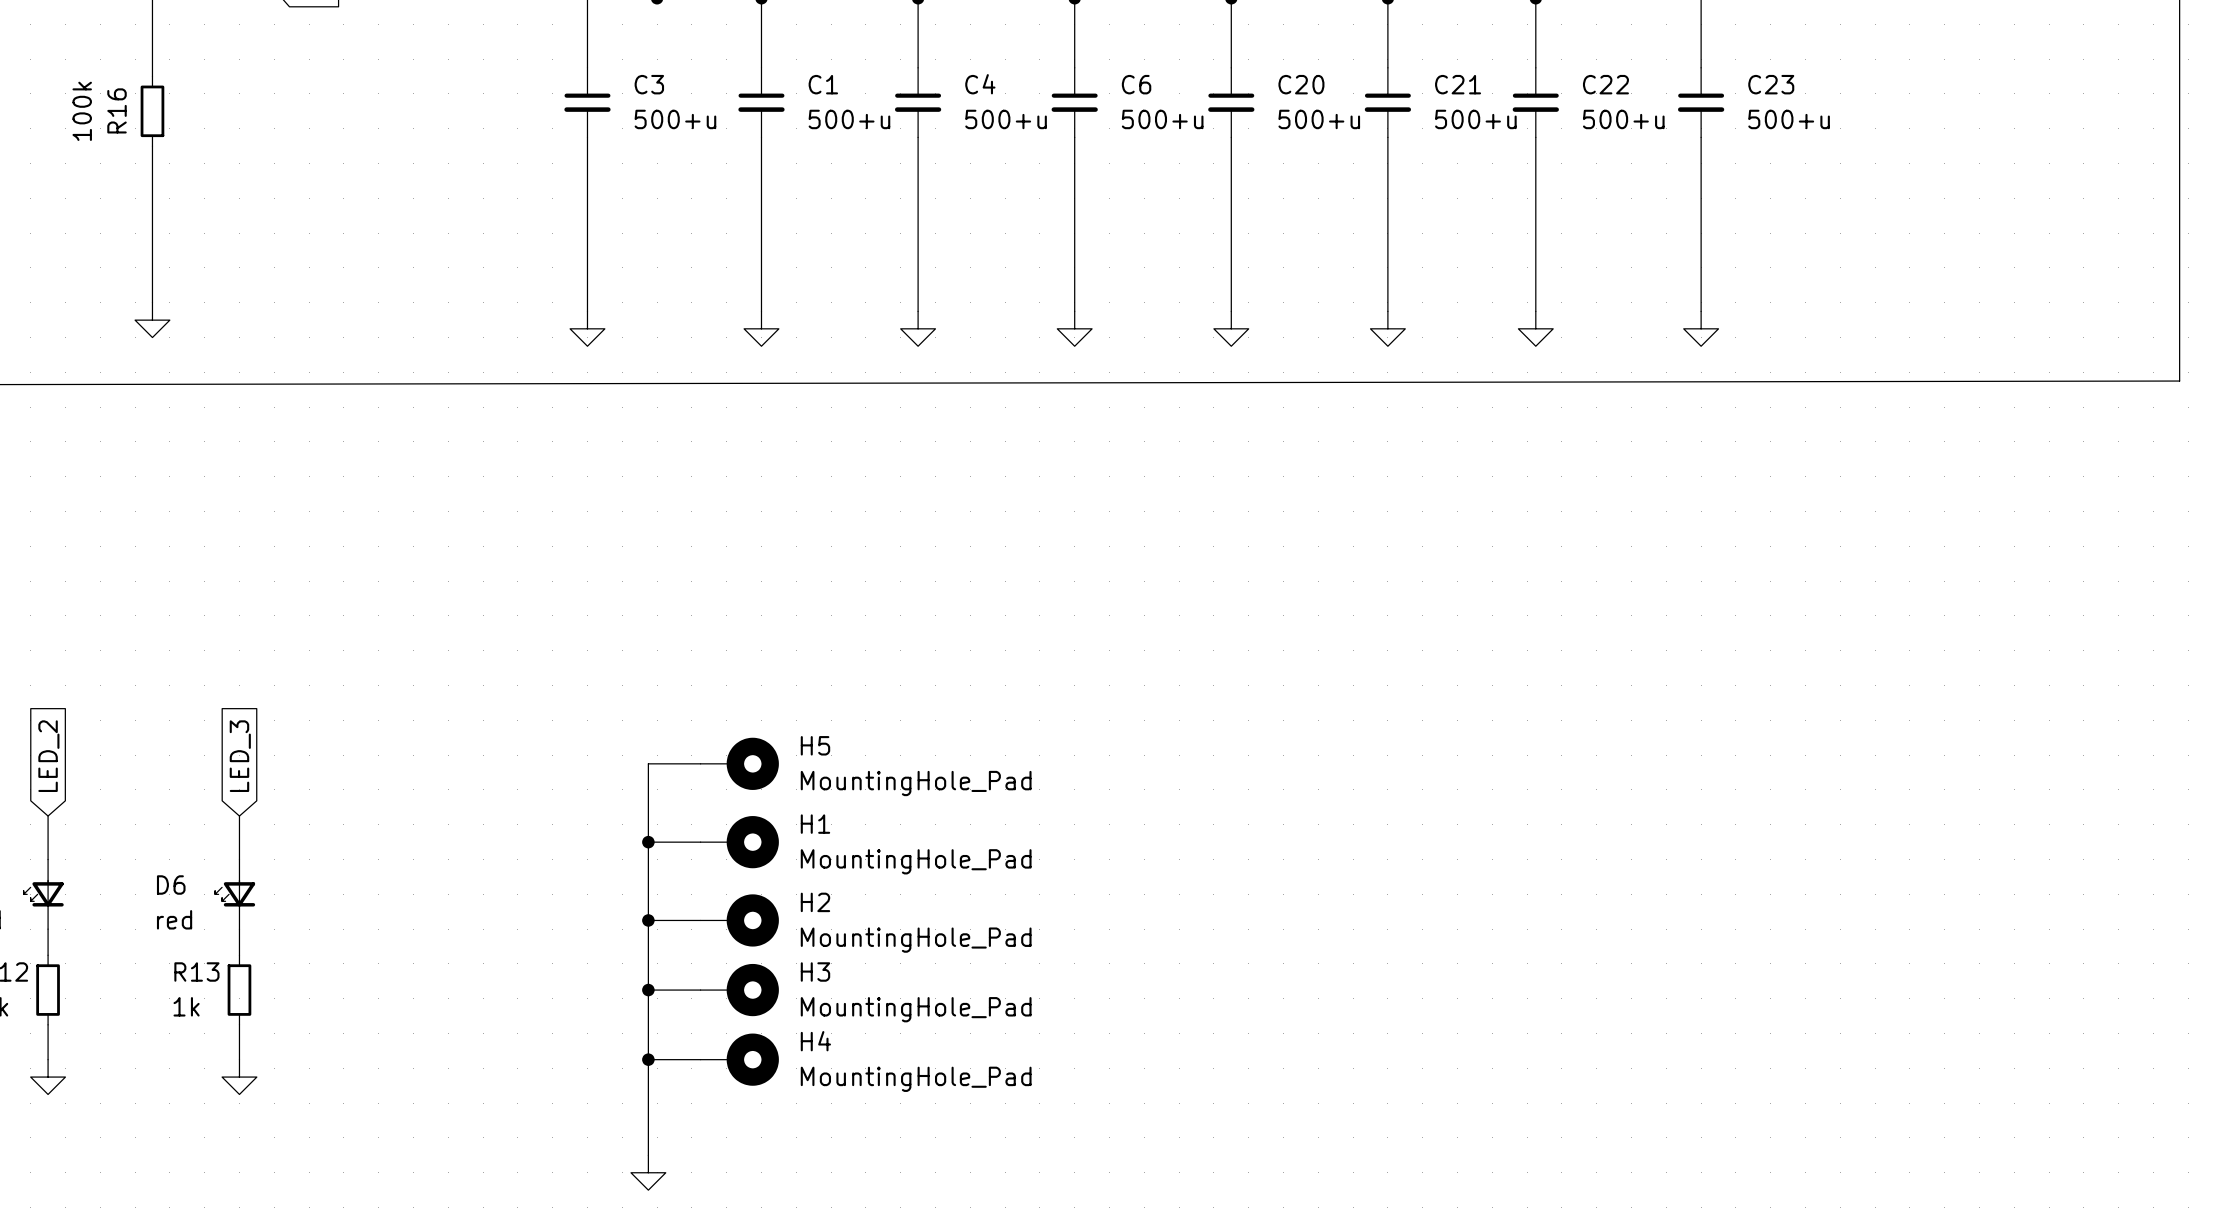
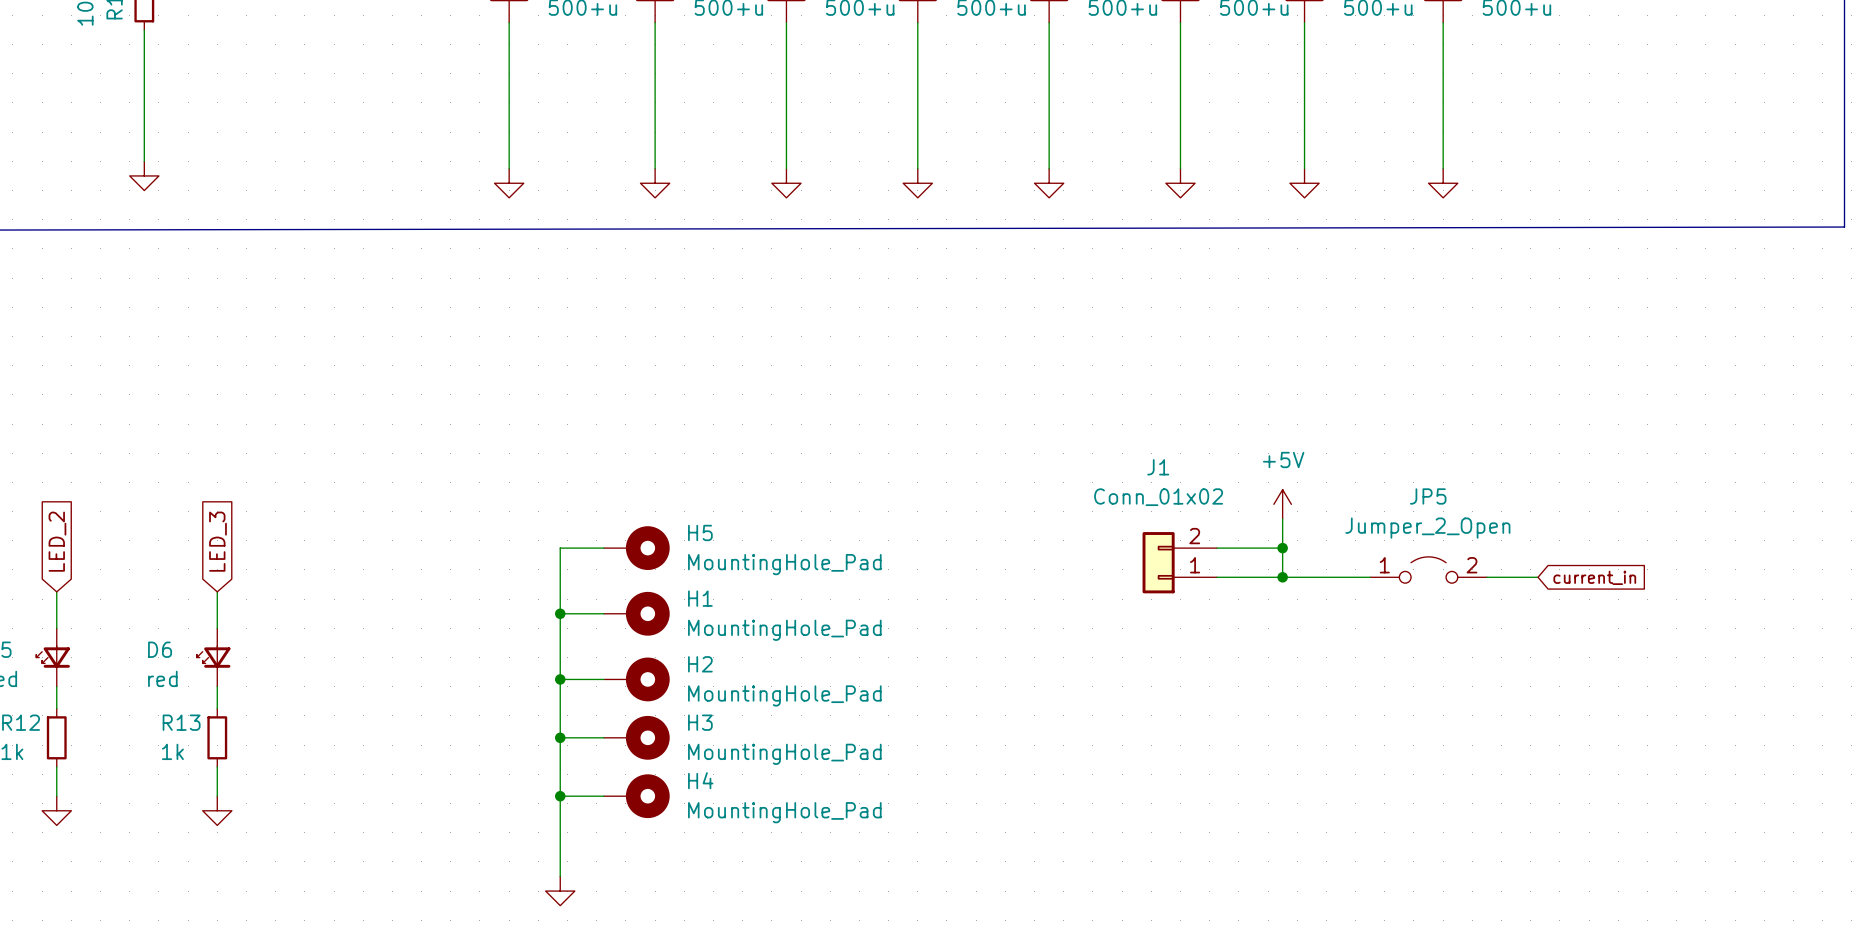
power symbol: none -> +5V (1282, 504)
wire: none -> (1282, 518) (1282, 577)
wire: none -> (1216, 548) (1282, 548)
junction: none -> (1282, 548)
J1: none -> Conn_01x02 (1179, 562)
JP5: none -> Jumper_2_Open (1428, 569)
wire: none -> (1216, 577) (1370, 577)
junction: none -> (1282, 577)
wire: none -> (1486, 577) (1538, 577)
global label: none -> current_in (1594, 577)

